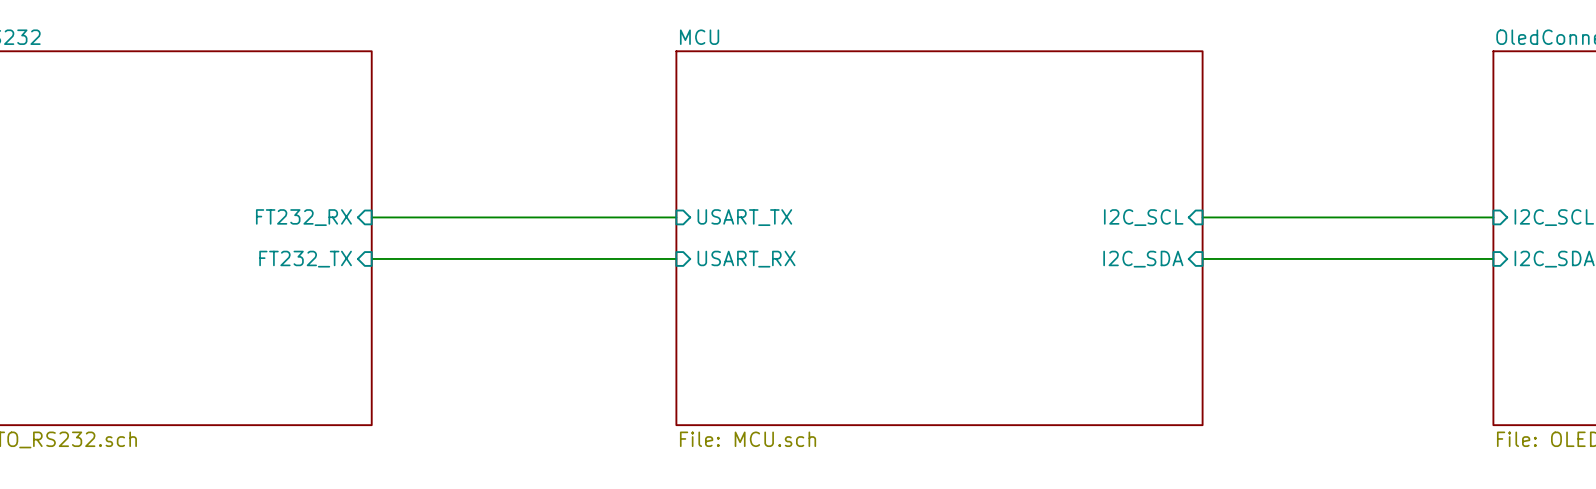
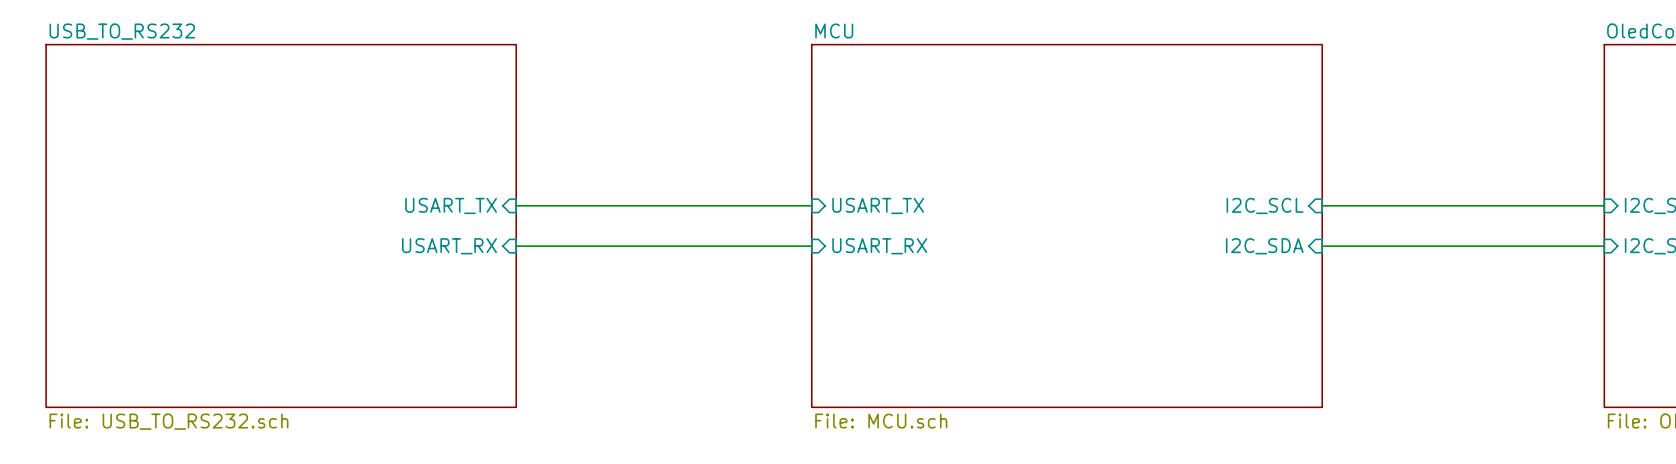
sheet pin: FT232_RX (303, 217) -> USART_TX (451, 205)
sheet pin: FT232_TX (305, 259) -> USART_RX (449, 246)

